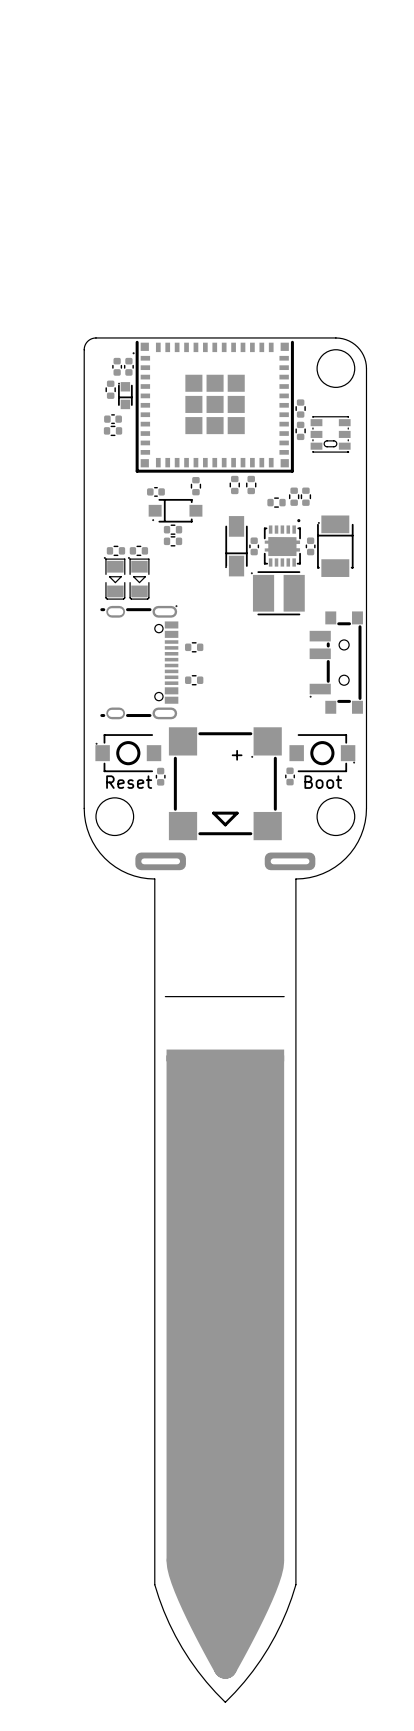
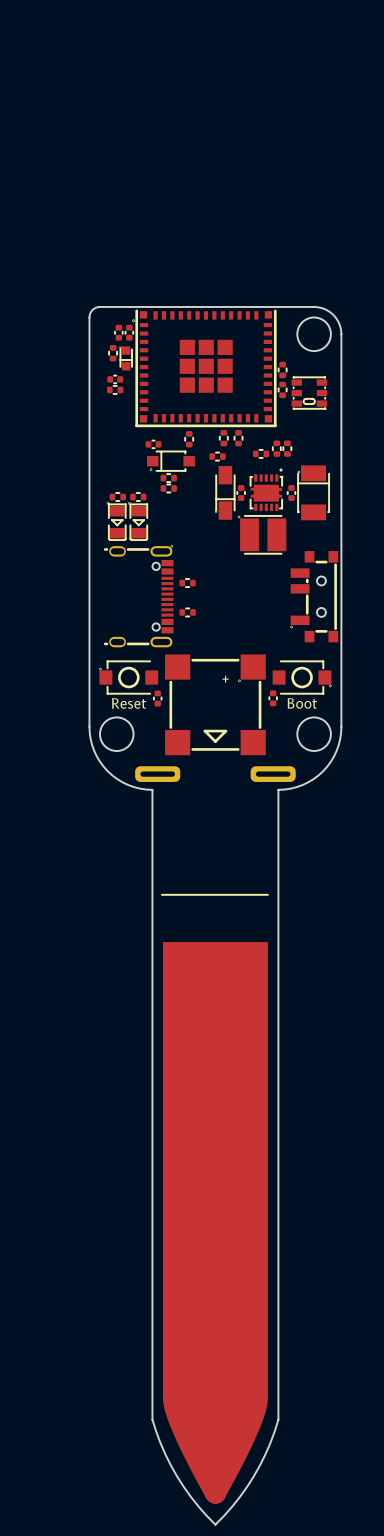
part: none -> (217, 456)

